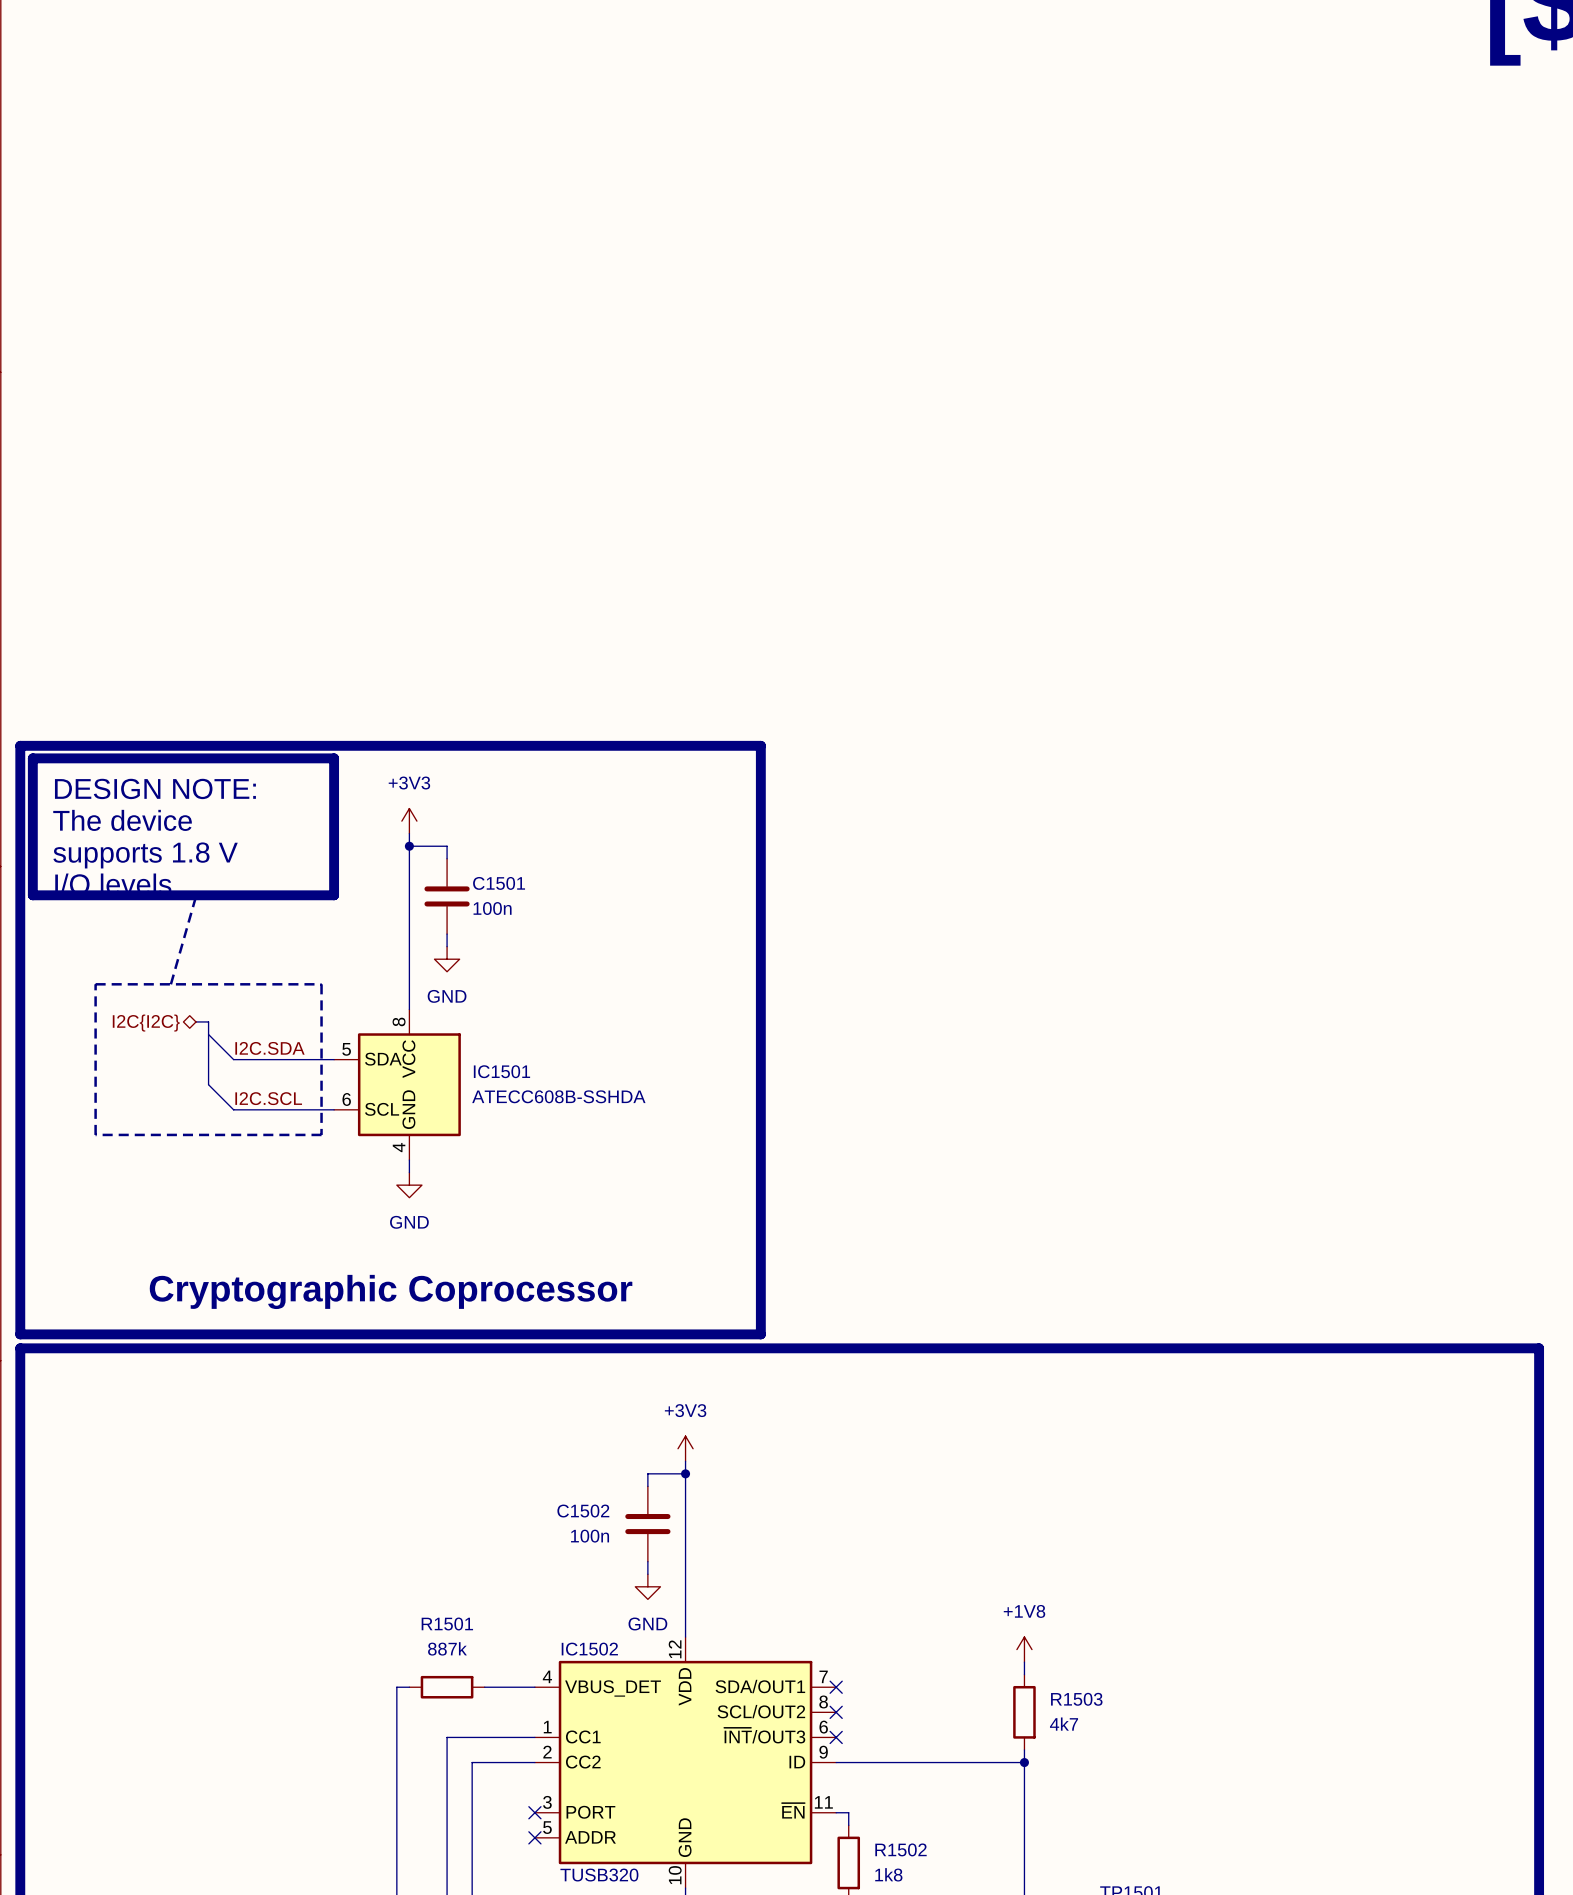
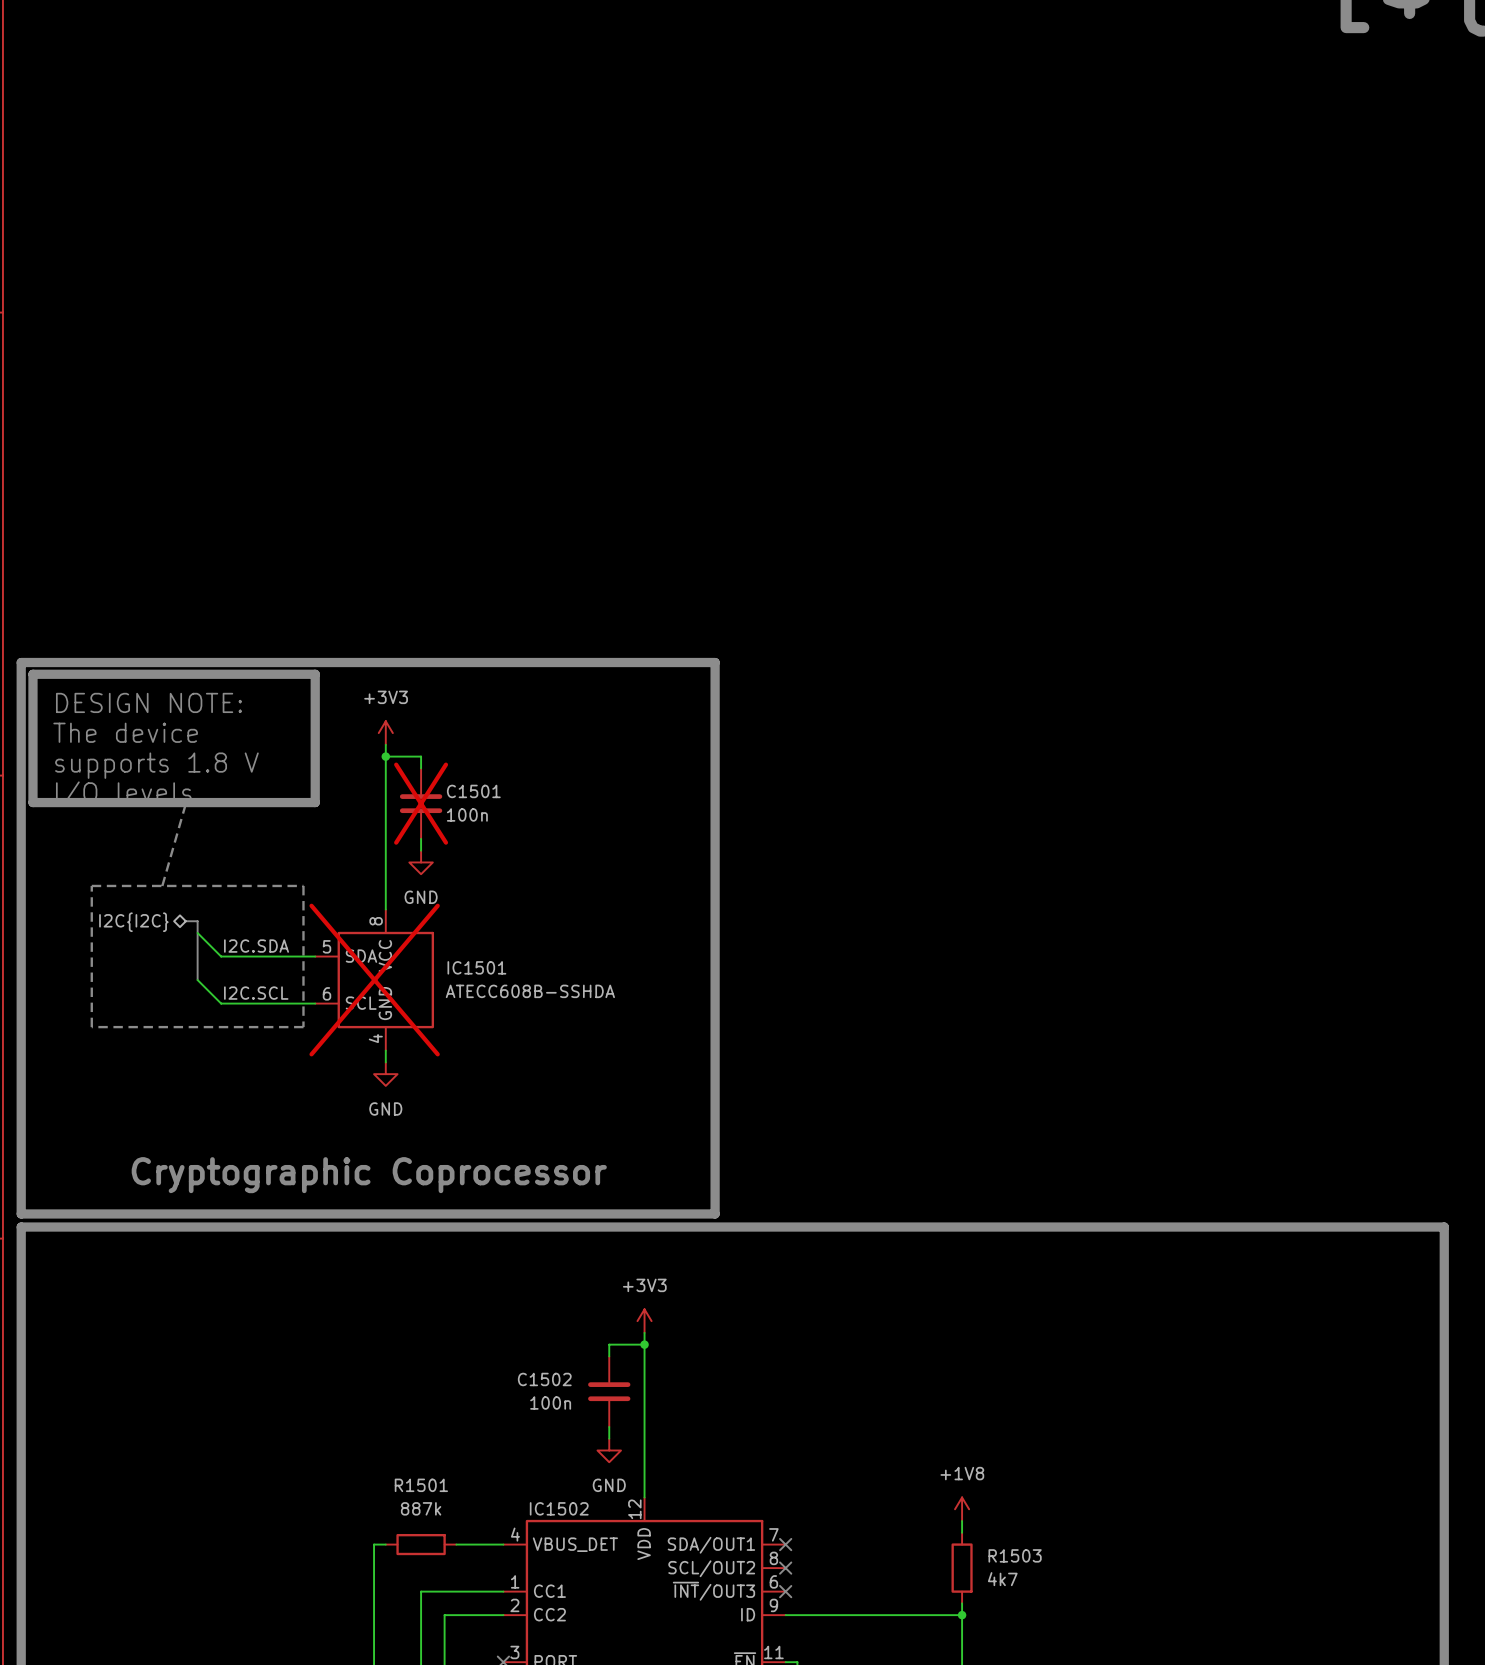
C1501 do-not-place cross: none -> (421, 803)
IC1501 do-not-place cross: none -> (374, 980)

